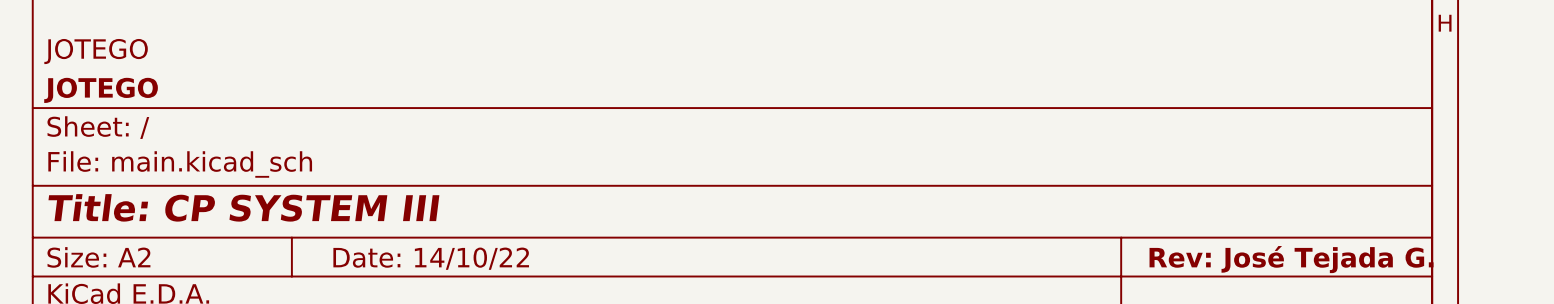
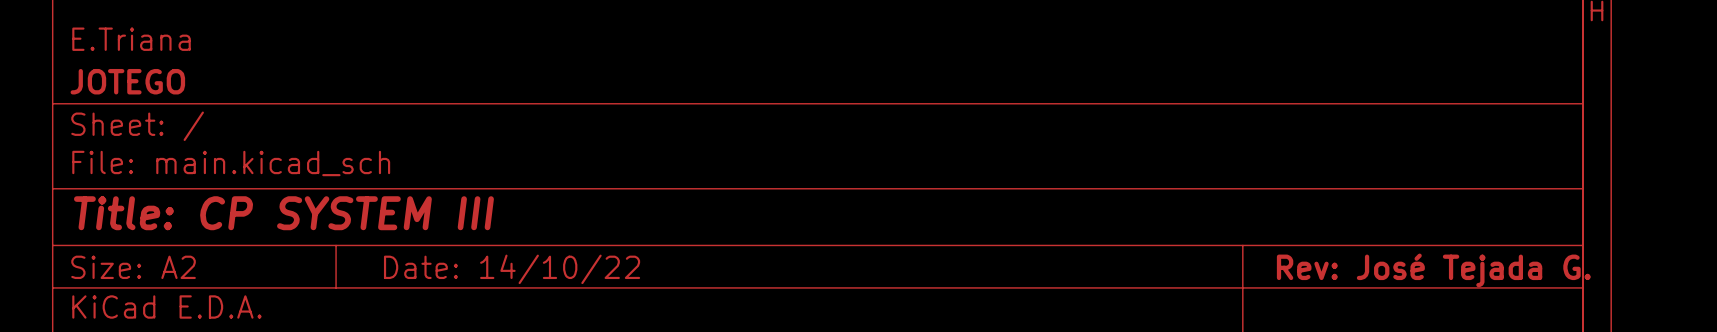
title block: JOTEGO (96, 51) -> E.Triana (131, 39)

